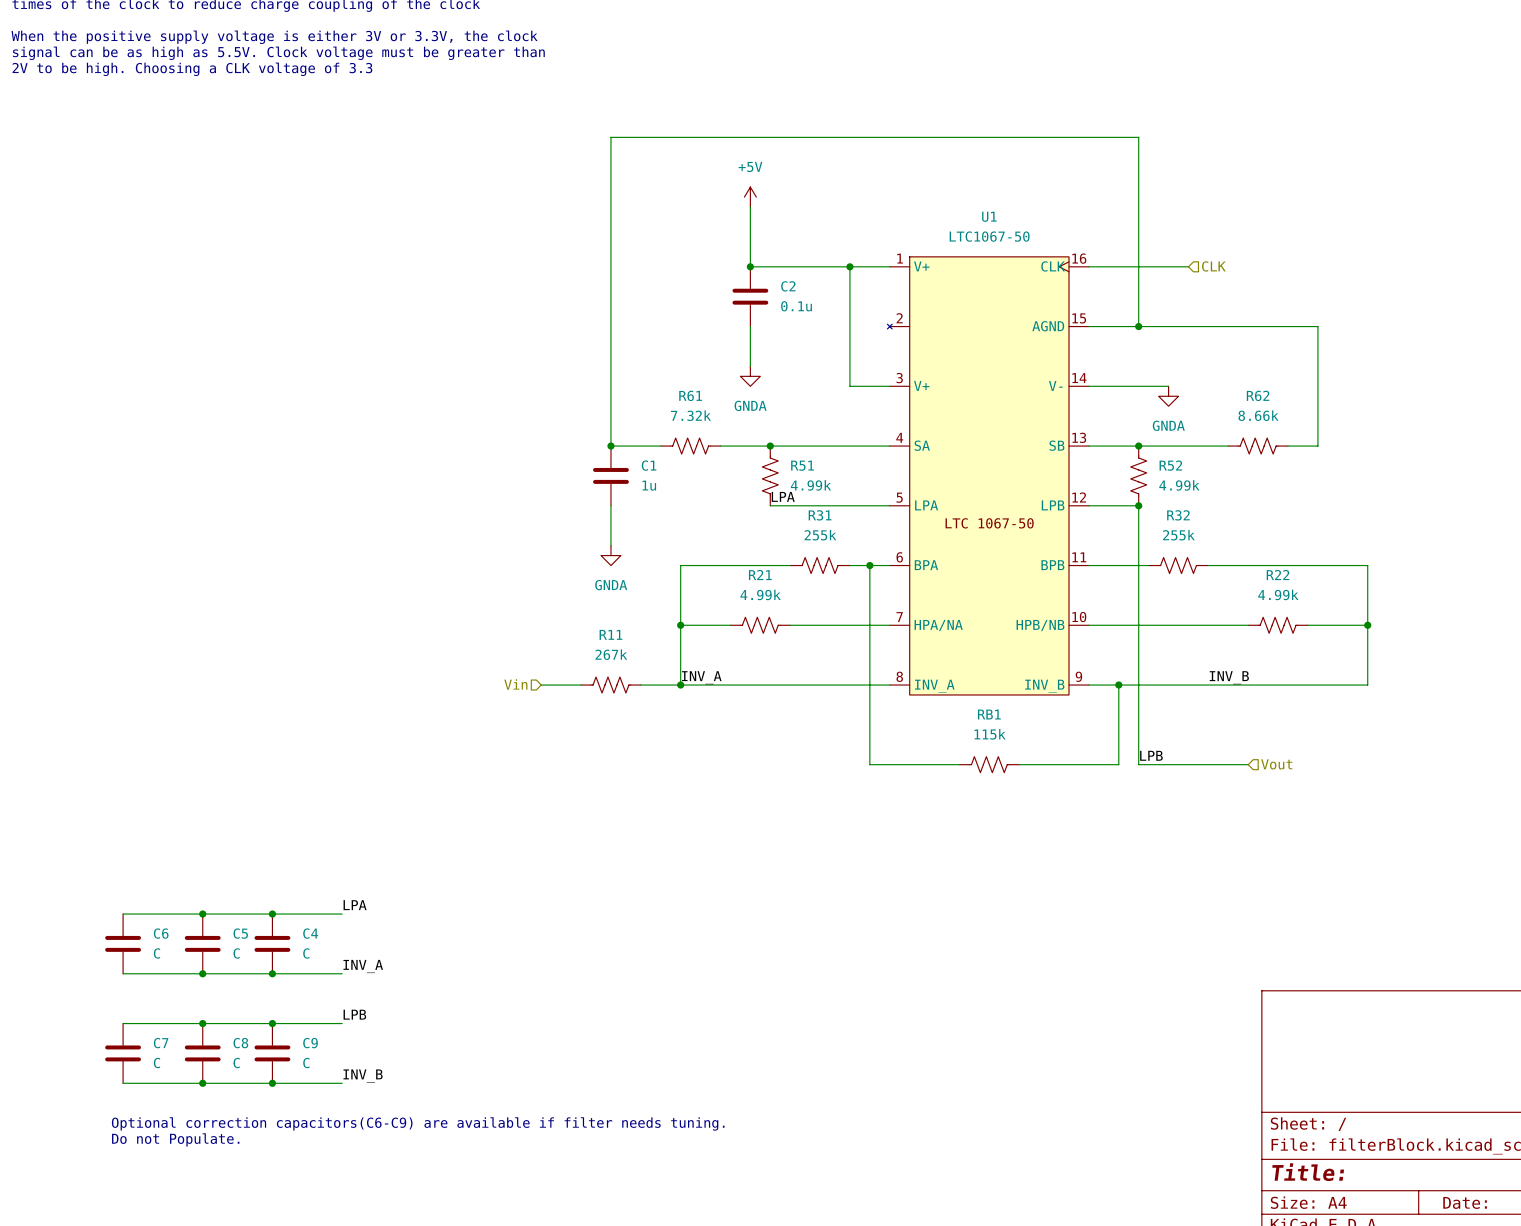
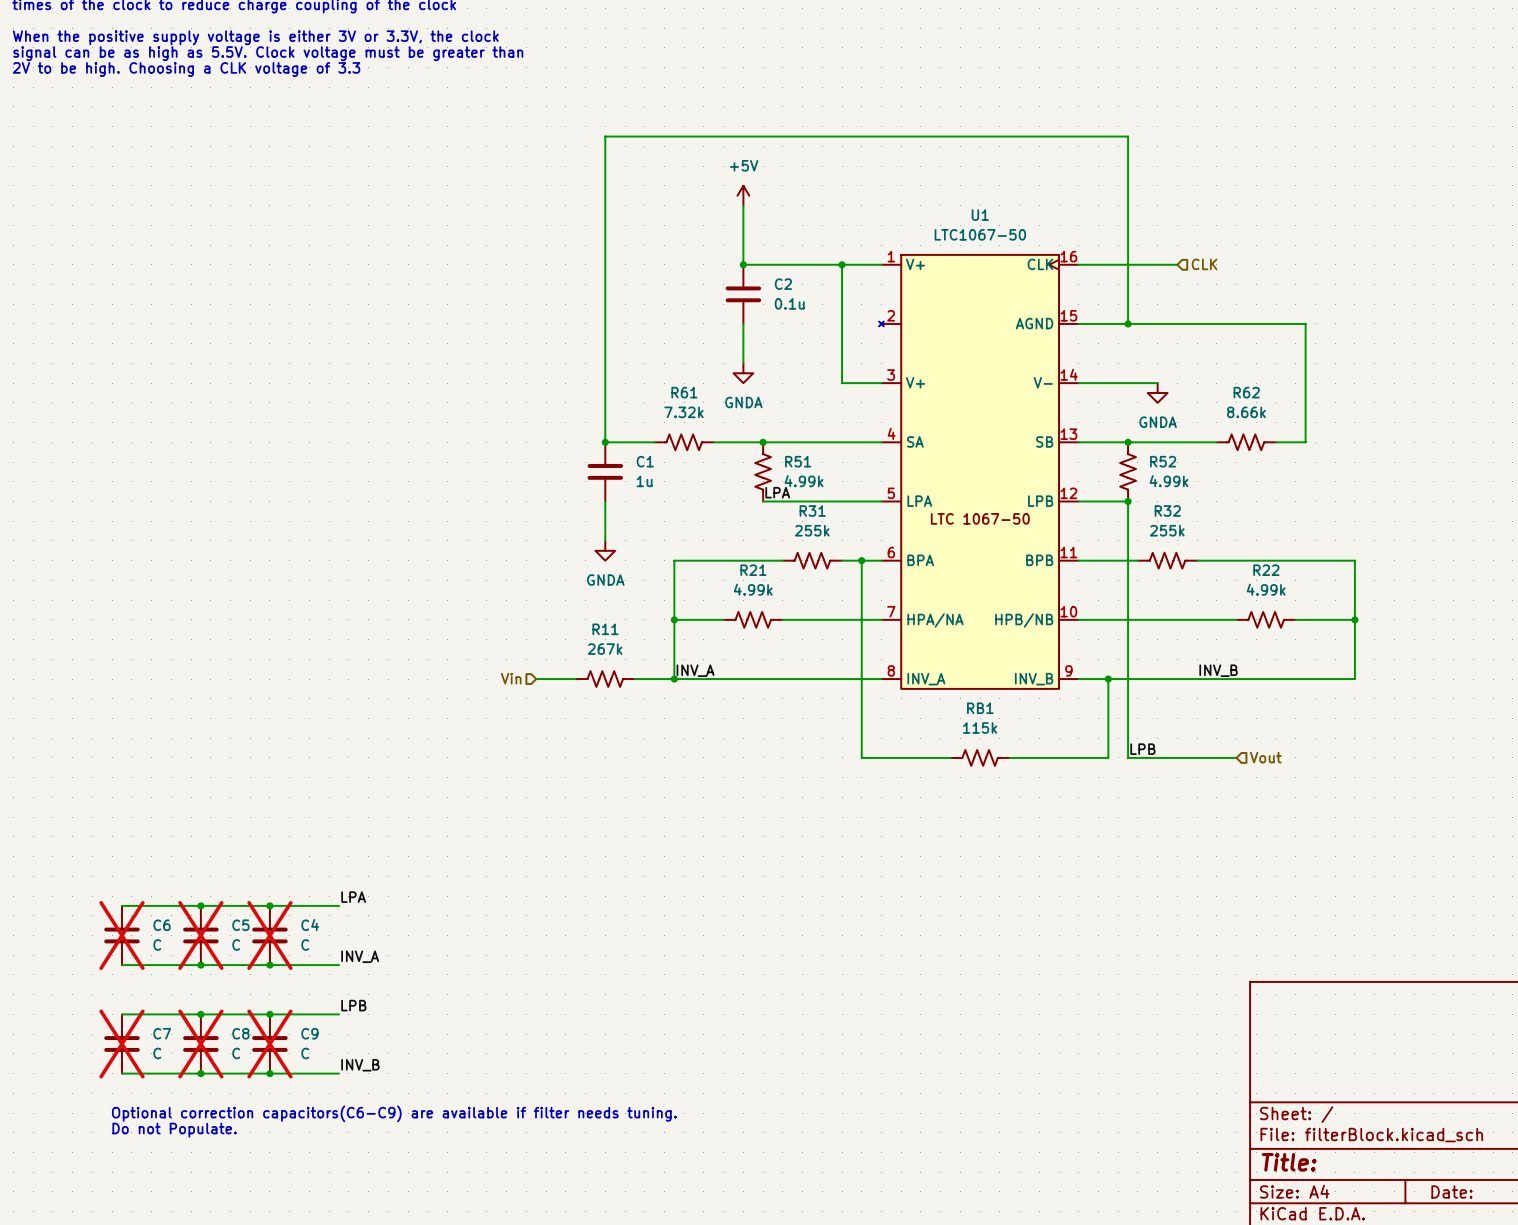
C6 do-not-place cross: none -> (121, 935)
C5 do-not-place cross: none -> (200, 935)
C4 do-not-place cross: none -> (269, 935)
C7 do-not-place cross: none -> (121, 1043)
C8 do-not-place cross: none -> (200, 1043)
C9 do-not-place cross: none -> (269, 1043)

